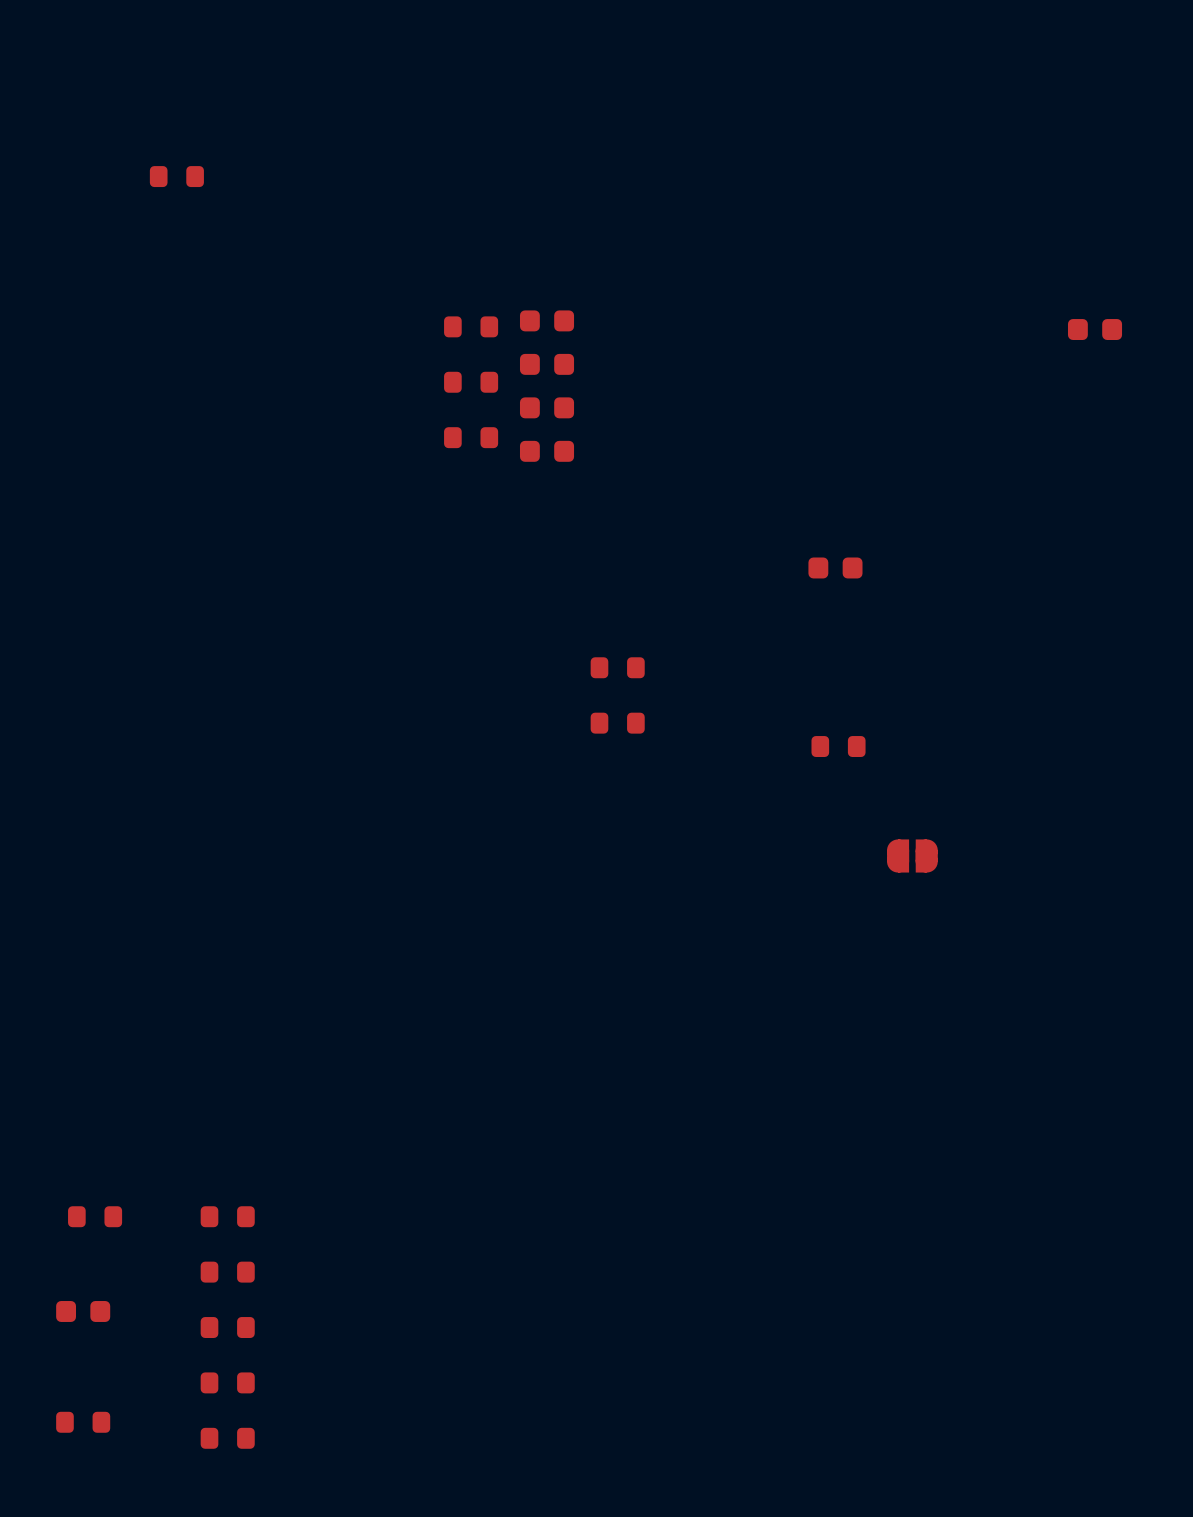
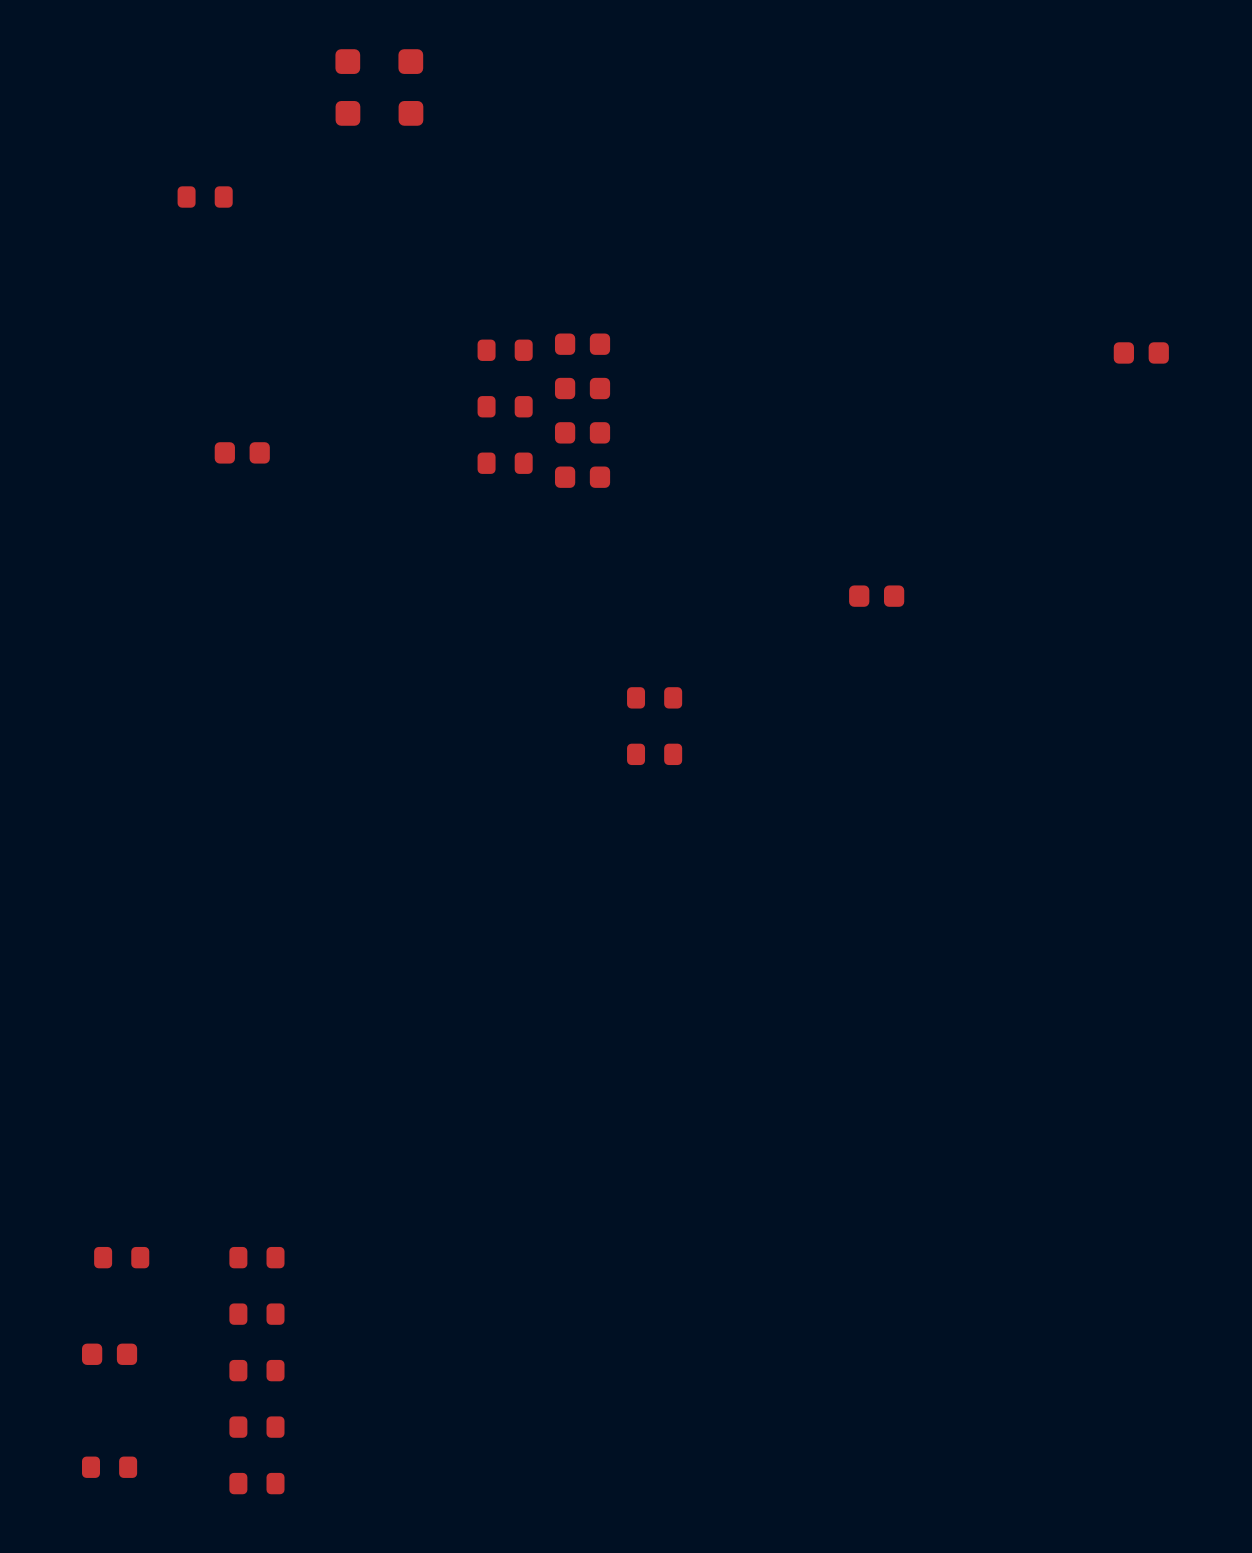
part: none -> (379, 61)
part: none -> (379, 113)
part: none -> (242, 452)
part: (838, 746) -> none
part: (912, 855) -> none

